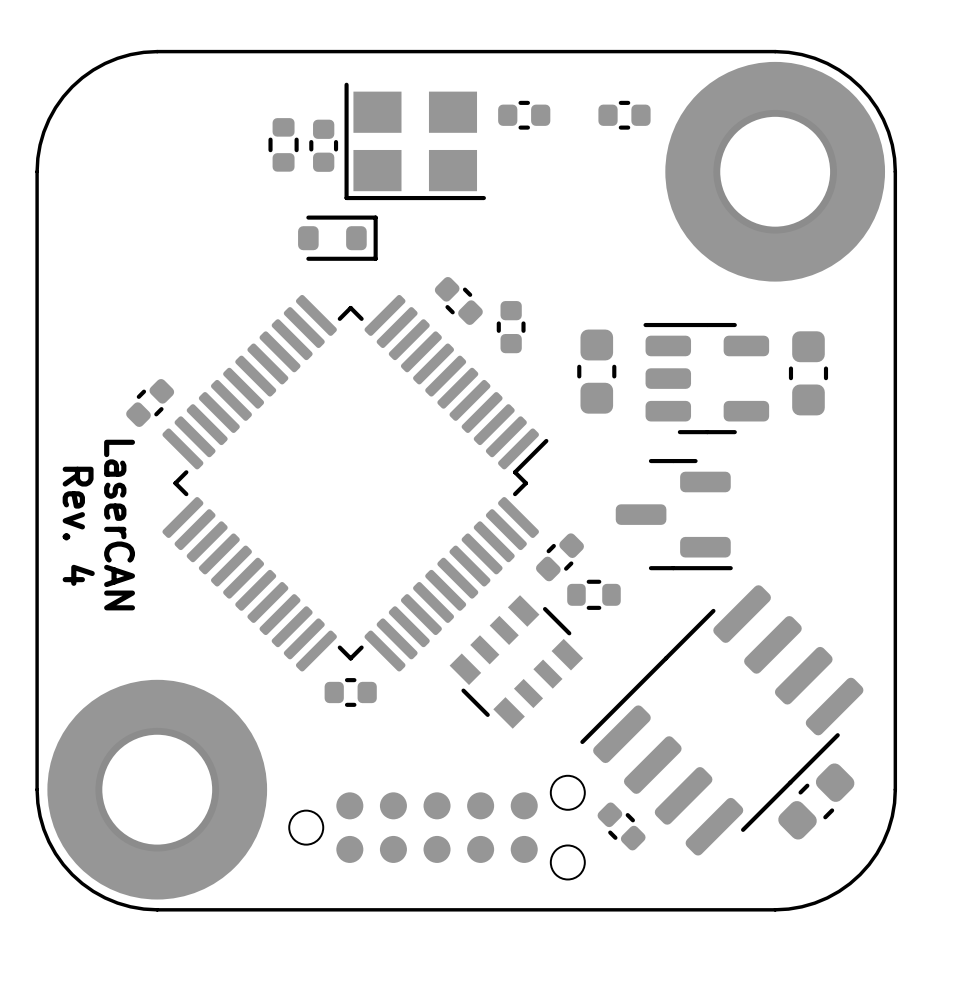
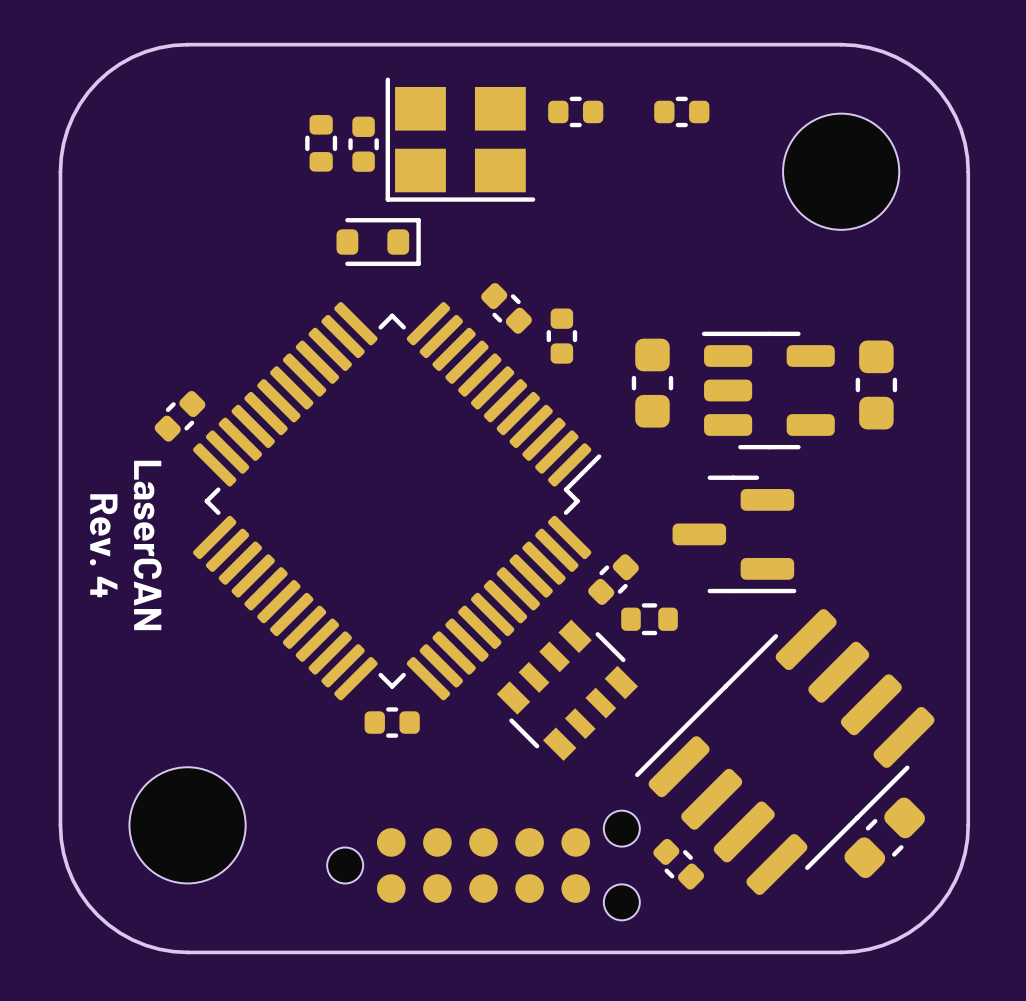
part footprint: [665, 61, 886, 282] -> [783, 113, 900, 230]
part footprint: [47, 679, 268, 900] -> [129, 767, 246, 884]

